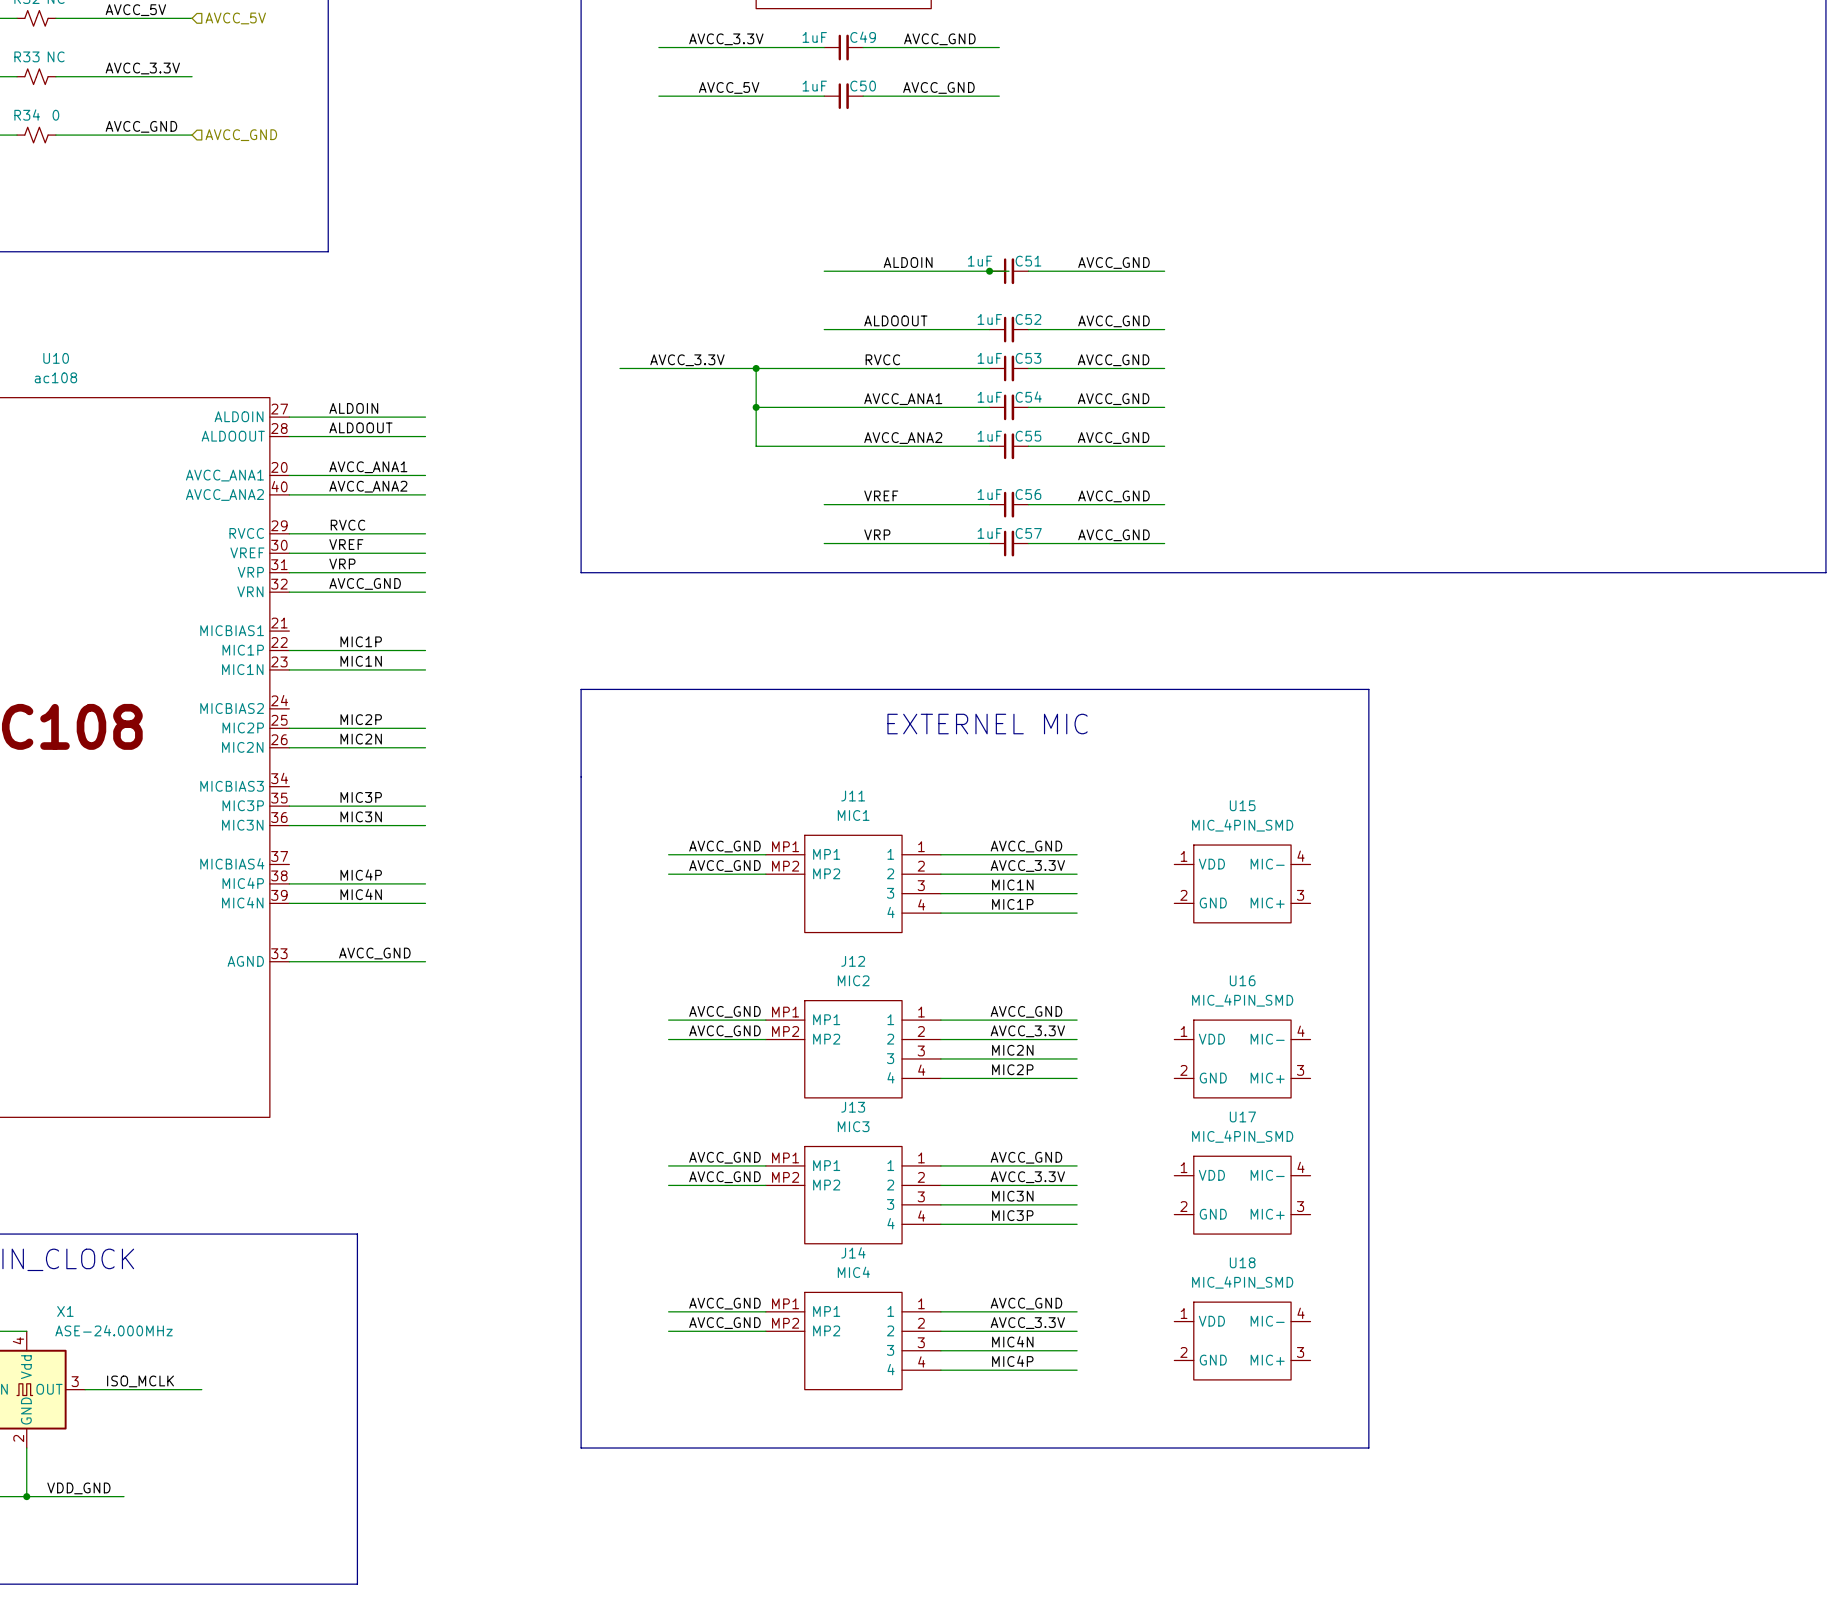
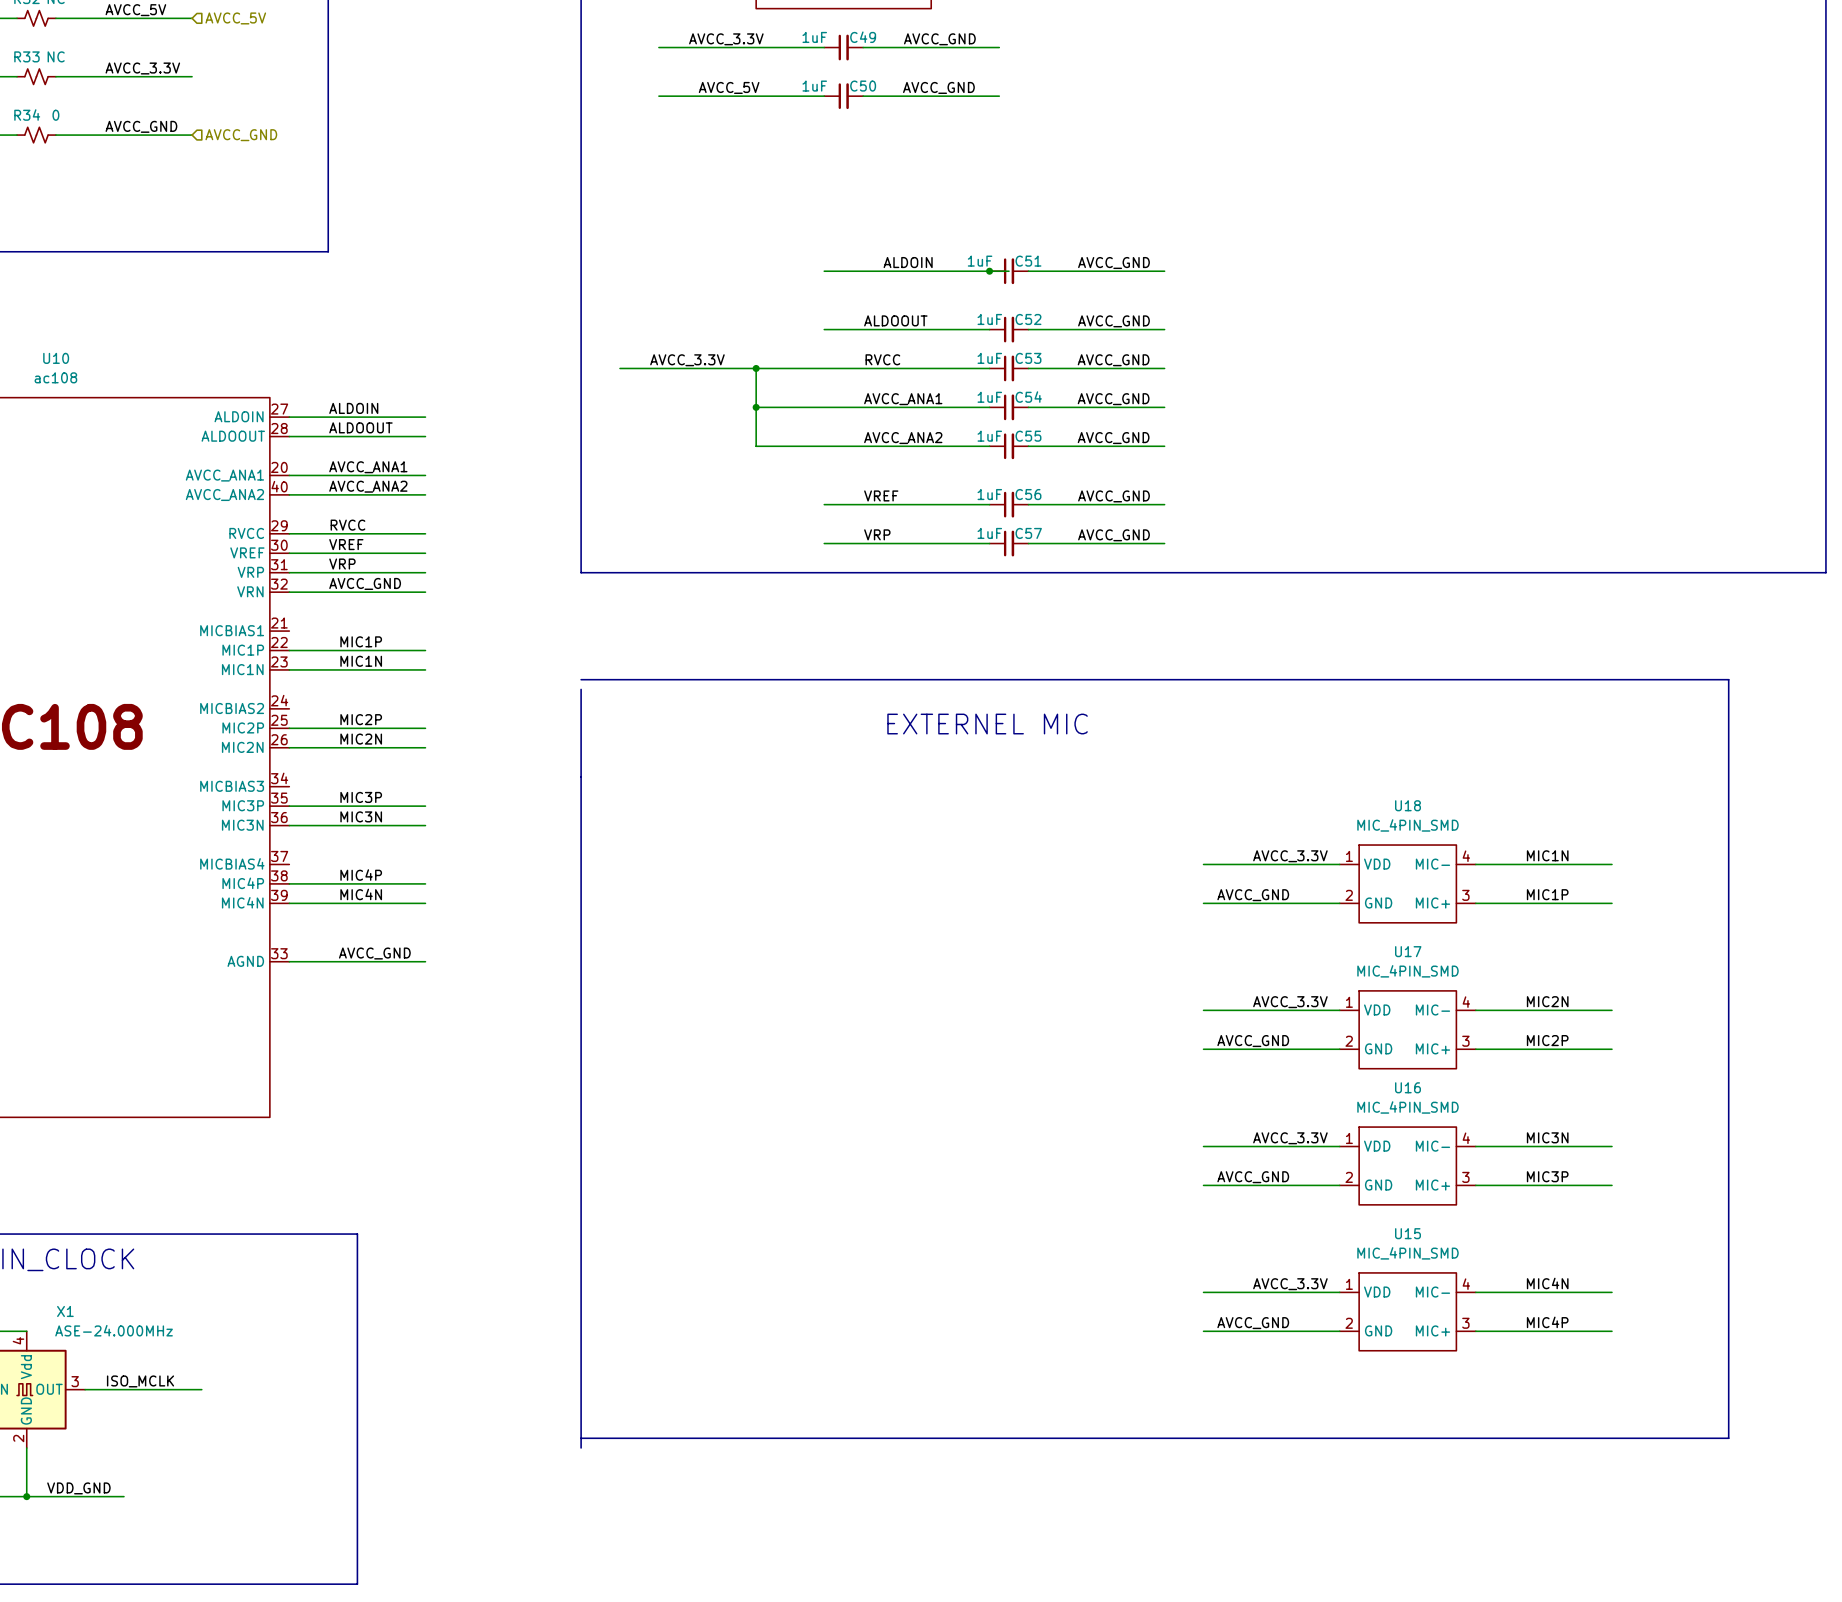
line: none -> (581, 679) (1728, 679) (1728, 1438) (581, 1438)
line: (581, 689) (1368, 689) (1368, 1448) (581, 1448) -> none
label: AVCC_GND (724, 846) -> none
label: AVCC_GND (1026, 846) -> none
wire: (668, 854) (765, 854) -> none
wire: (940, 854) (1077, 854) -> none
label: none -> MIC1N (1547, 855)
label: none -> AVCC_3.3V (1290, 856)
wire: none -> (1203, 864) (1339, 864)
wire: none -> (1475, 864) (1611, 864)
label: AVCC_GND (724, 865) -> none
label: AVCC_3.3V (1027, 865) -> none
wire: (668, 874) (765, 874) -> none
wire: (940, 874) (1077, 874) -> none
J11: MIC1 (853, 883) -> none
U15 position: (1242, 883) -> (1407, 1311)
label: MIC1N (1012, 884) -> none
wire: (940, 893) (1077, 893) -> none
label: none -> MIC1P (1547, 894)
label: none -> AVCC_GND (1253, 895)
wire: none -> (1203, 903) (1339, 903)
wire: none -> (1475, 903) (1611, 903)
label: MIC1P (1012, 904) -> none
wire: (940, 913) (1077, 913) -> none
label: none -> MIC2N (1547, 1001)
label: none -> AVCC_3.3V (1290, 1002)
wire: none -> (1203, 1010) (1339, 1010)
wire: none -> (1475, 1010) (1611, 1010)
label: AVCC_GND (724, 1011) -> none
label: AVCC_GND (1026, 1011) -> none
wire: (668, 1020) (765, 1020) -> none
wire: (940, 1020) (1077, 1020) -> none
label: AVCC_GND (724, 1031) -> none
label: AVCC_3.3V (1027, 1031) -> none
wire: (668, 1039) (765, 1039) -> none
wire: (940, 1039) (1077, 1039) -> none
label: none -> MIC2P (1547, 1040)
label: none -> AVCC_GND (1253, 1041)
J12: MIC2 (853, 1049) -> none
wire: none -> (1203, 1049) (1339, 1049)
wire: none -> (1475, 1049) (1611, 1049)
label: MIC2N (1012, 1050) -> none
wire: (940, 1058) (1077, 1058) -> none
U16 position: (1242, 1058) -> (1407, 1165)
label: MIC2P (1012, 1069) -> none
wire: (940, 1078) (1077, 1078) -> none
label: none -> MIC3N (1547, 1137)
label: none -> AVCC_3.3V (1290, 1138)
wire: none -> (1203, 1146) (1339, 1146)
wire: none -> (1475, 1146) (1611, 1146)
label: AVCC_GND (724, 1157) -> none
label: AVCC_GND (1026, 1157) -> none
wire: (668, 1165) (765, 1165) -> none
wire: (940, 1165) (1077, 1165) -> none
label: none -> MIC3P (1547, 1176)
label: AVCC_GND (724, 1177) -> none
label: AVCC_3.3V (1027, 1177) -> none
label: none -> AVCC_GND (1253, 1177)
wire: (668, 1185) (765, 1185) -> none
wire: (940, 1185) (1077, 1185) -> none
wire: none -> (1203, 1185) (1339, 1185)
wire: none -> (1475, 1185) (1611, 1185)
J13: MIC3 (853, 1195) -> none
U17 position: (1242, 1195) -> (1407, 1029)
label: MIC3N (1012, 1196) -> none
wire: (940, 1204) (1077, 1204) -> none
label: MIC3P (1012, 1215) -> none
wire: (940, 1224) (1077, 1224) -> none
label: none -> MIC4N (1547, 1283)
label: none -> AVCC_3.3V (1290, 1284)
wire: none -> (1203, 1292) (1339, 1292)
wire: none -> (1475, 1292) (1611, 1292)
label: AVCC_GND (724, 1303) -> none
label: AVCC_GND (1026, 1303) -> none
wire: (668, 1311) (765, 1311) -> none
wire: (940, 1311) (1077, 1311) -> none
label: none -> MIC4P (1547, 1322)
label: AVCC_GND (724, 1323) -> none
label: AVCC_3.3V (1027, 1323) -> none
label: none -> AVCC_GND (1253, 1323)
wire: (668, 1331) (765, 1331) -> none
wire: (940, 1331) (1077, 1331) -> none
wire: none -> (1203, 1331) (1339, 1331)
wire: none -> (1475, 1331) (1611, 1331)
J14: MIC4 (853, 1341) -> none
label: MIC4N (1012, 1341) -> none
U18 position: (1242, 1341) -> (1407, 883)
wire: (940, 1350) (1077, 1350) -> none
label: MIC4P (1012, 1361) -> none
wire: (940, 1370) (1077, 1370) -> none

